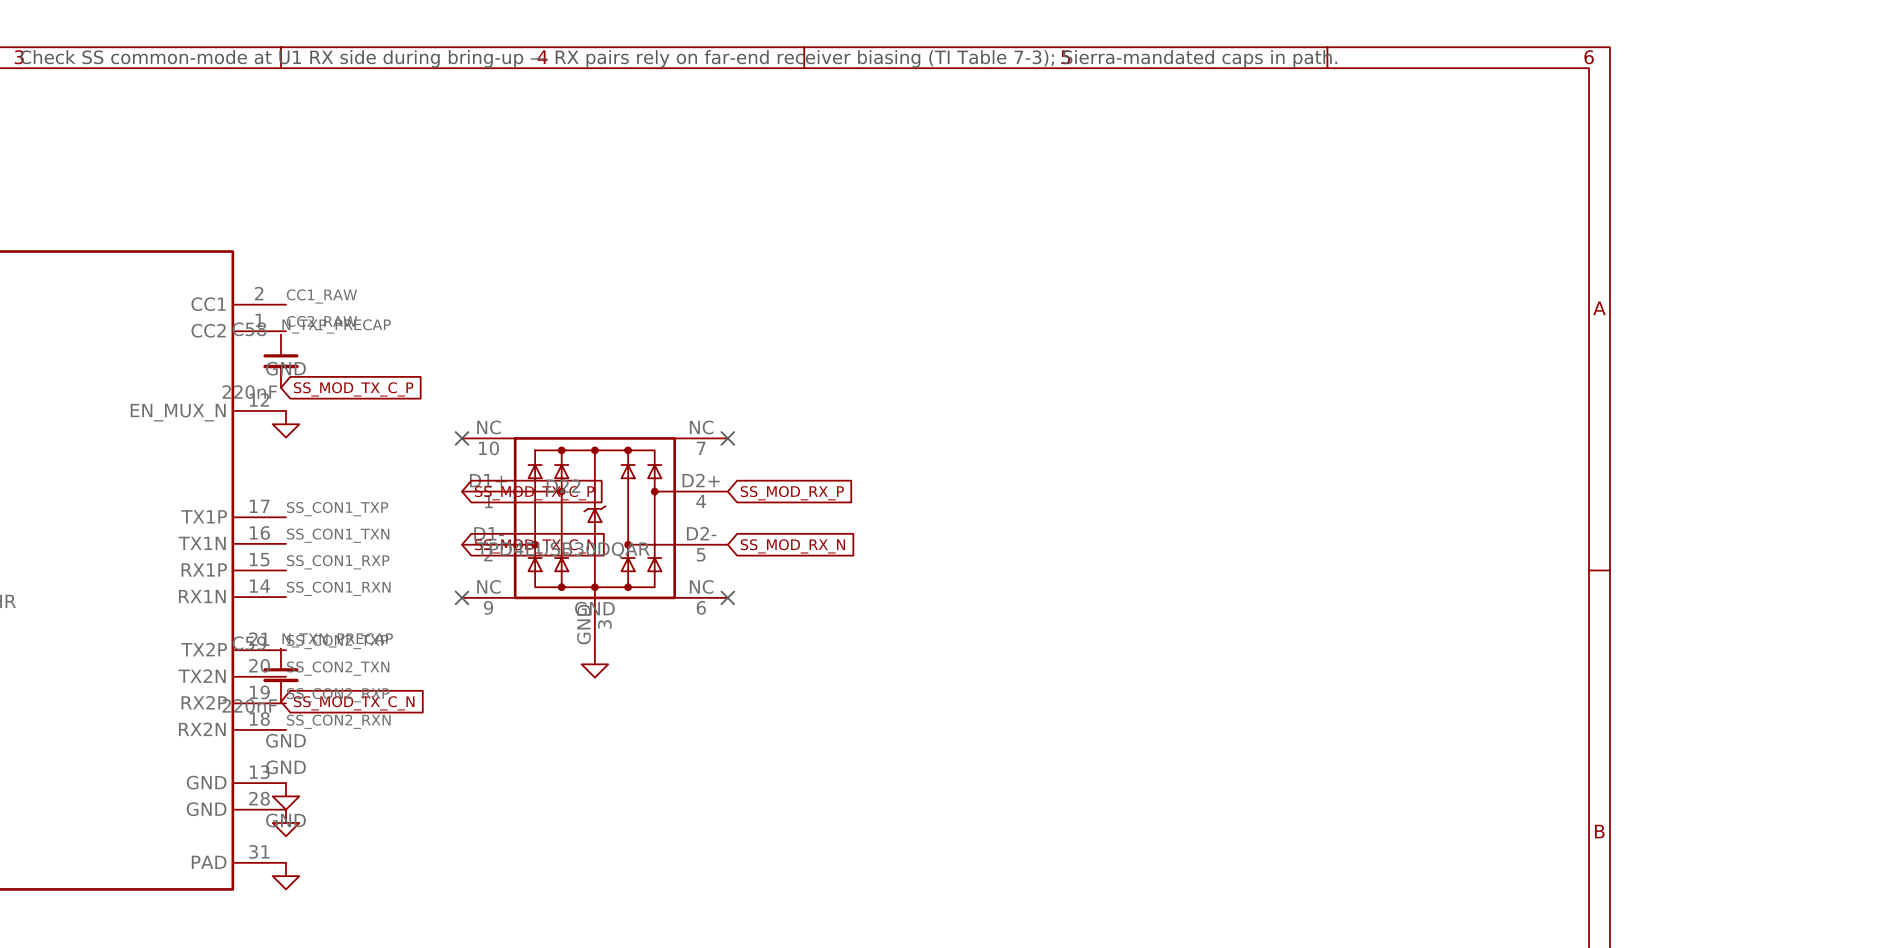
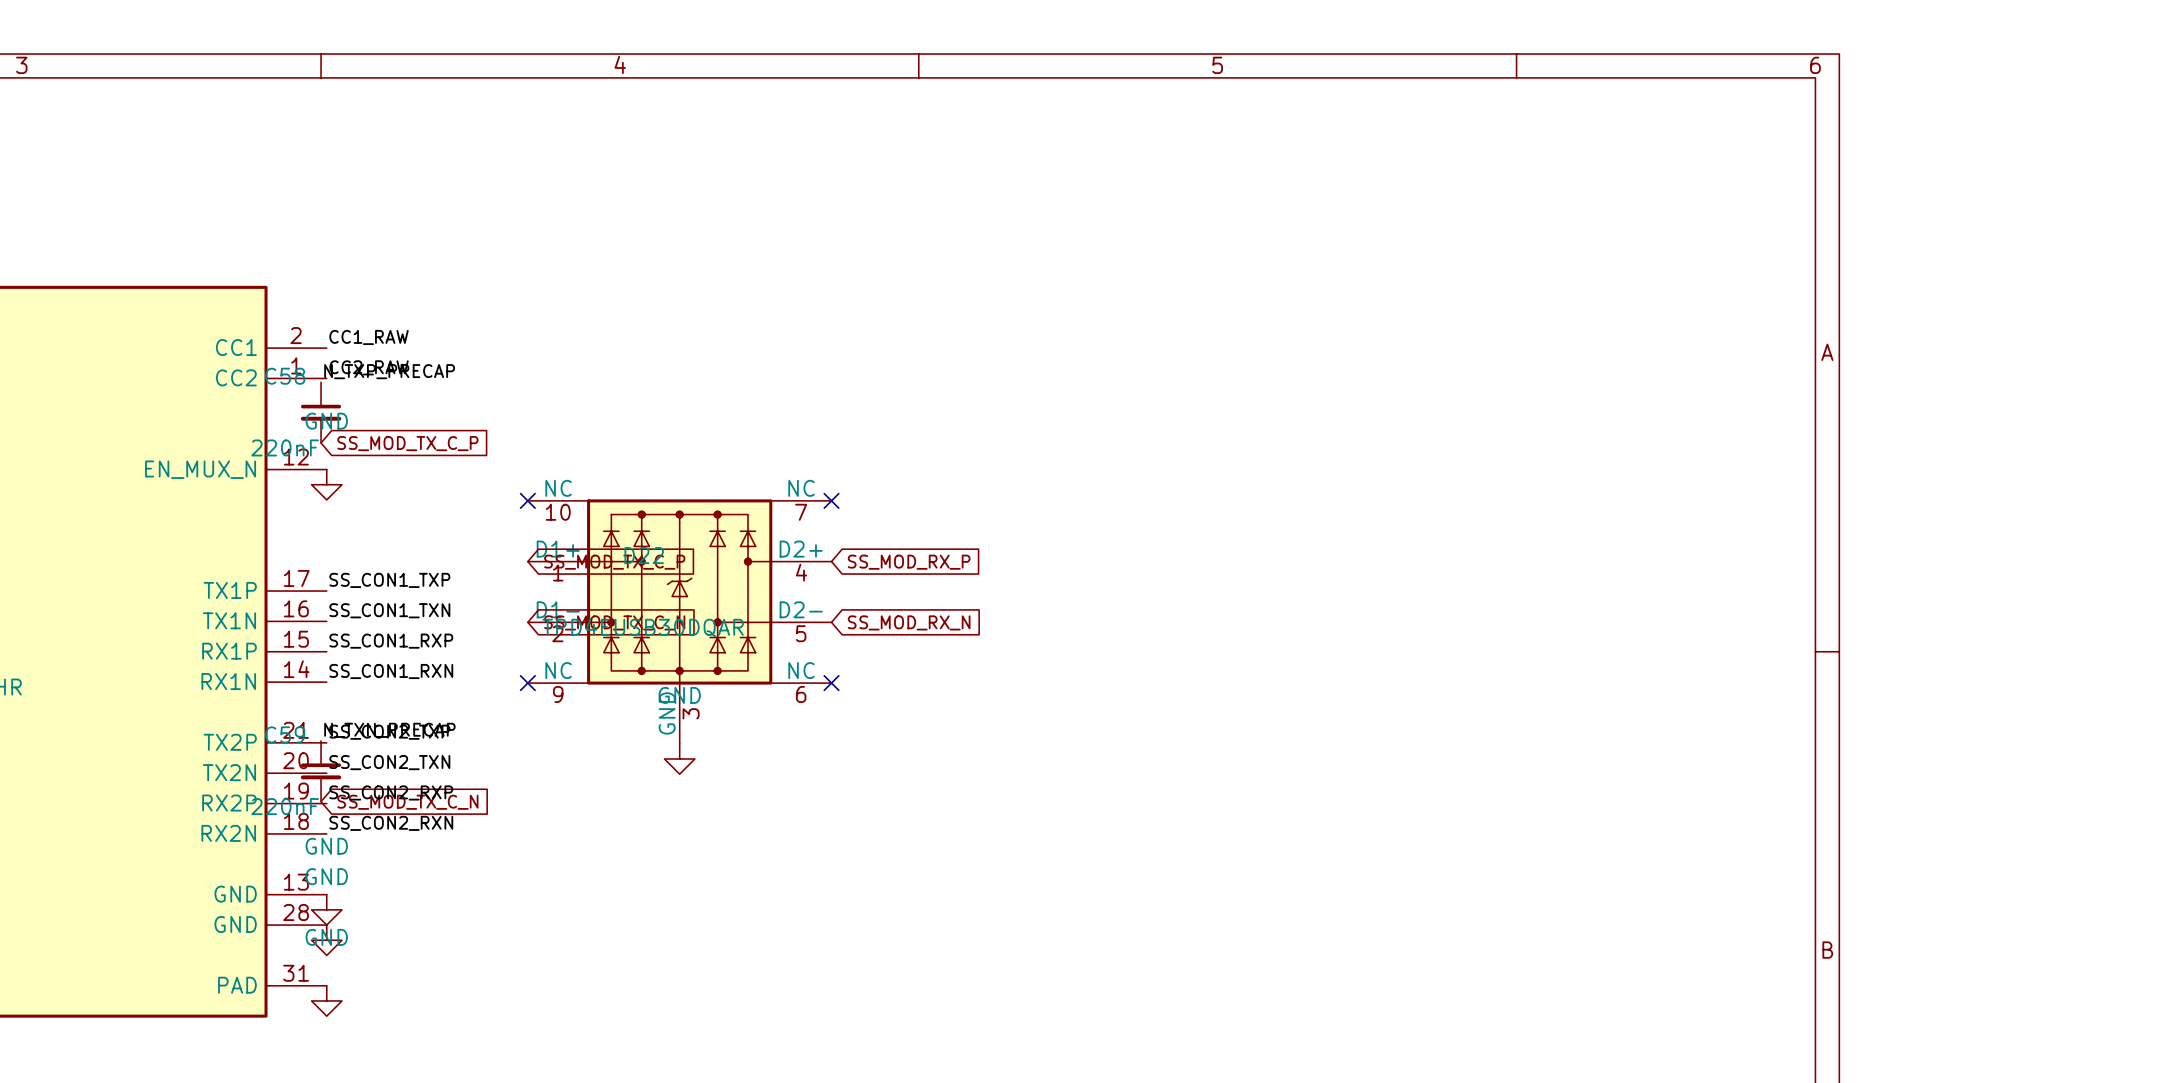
text: Check SS common-mode at U1 RX side during bring-up — RX pairs rely on far-end receiver biasing (TI Table 7-3); Sierra-mandated caps in path. (678, 58) -> none

